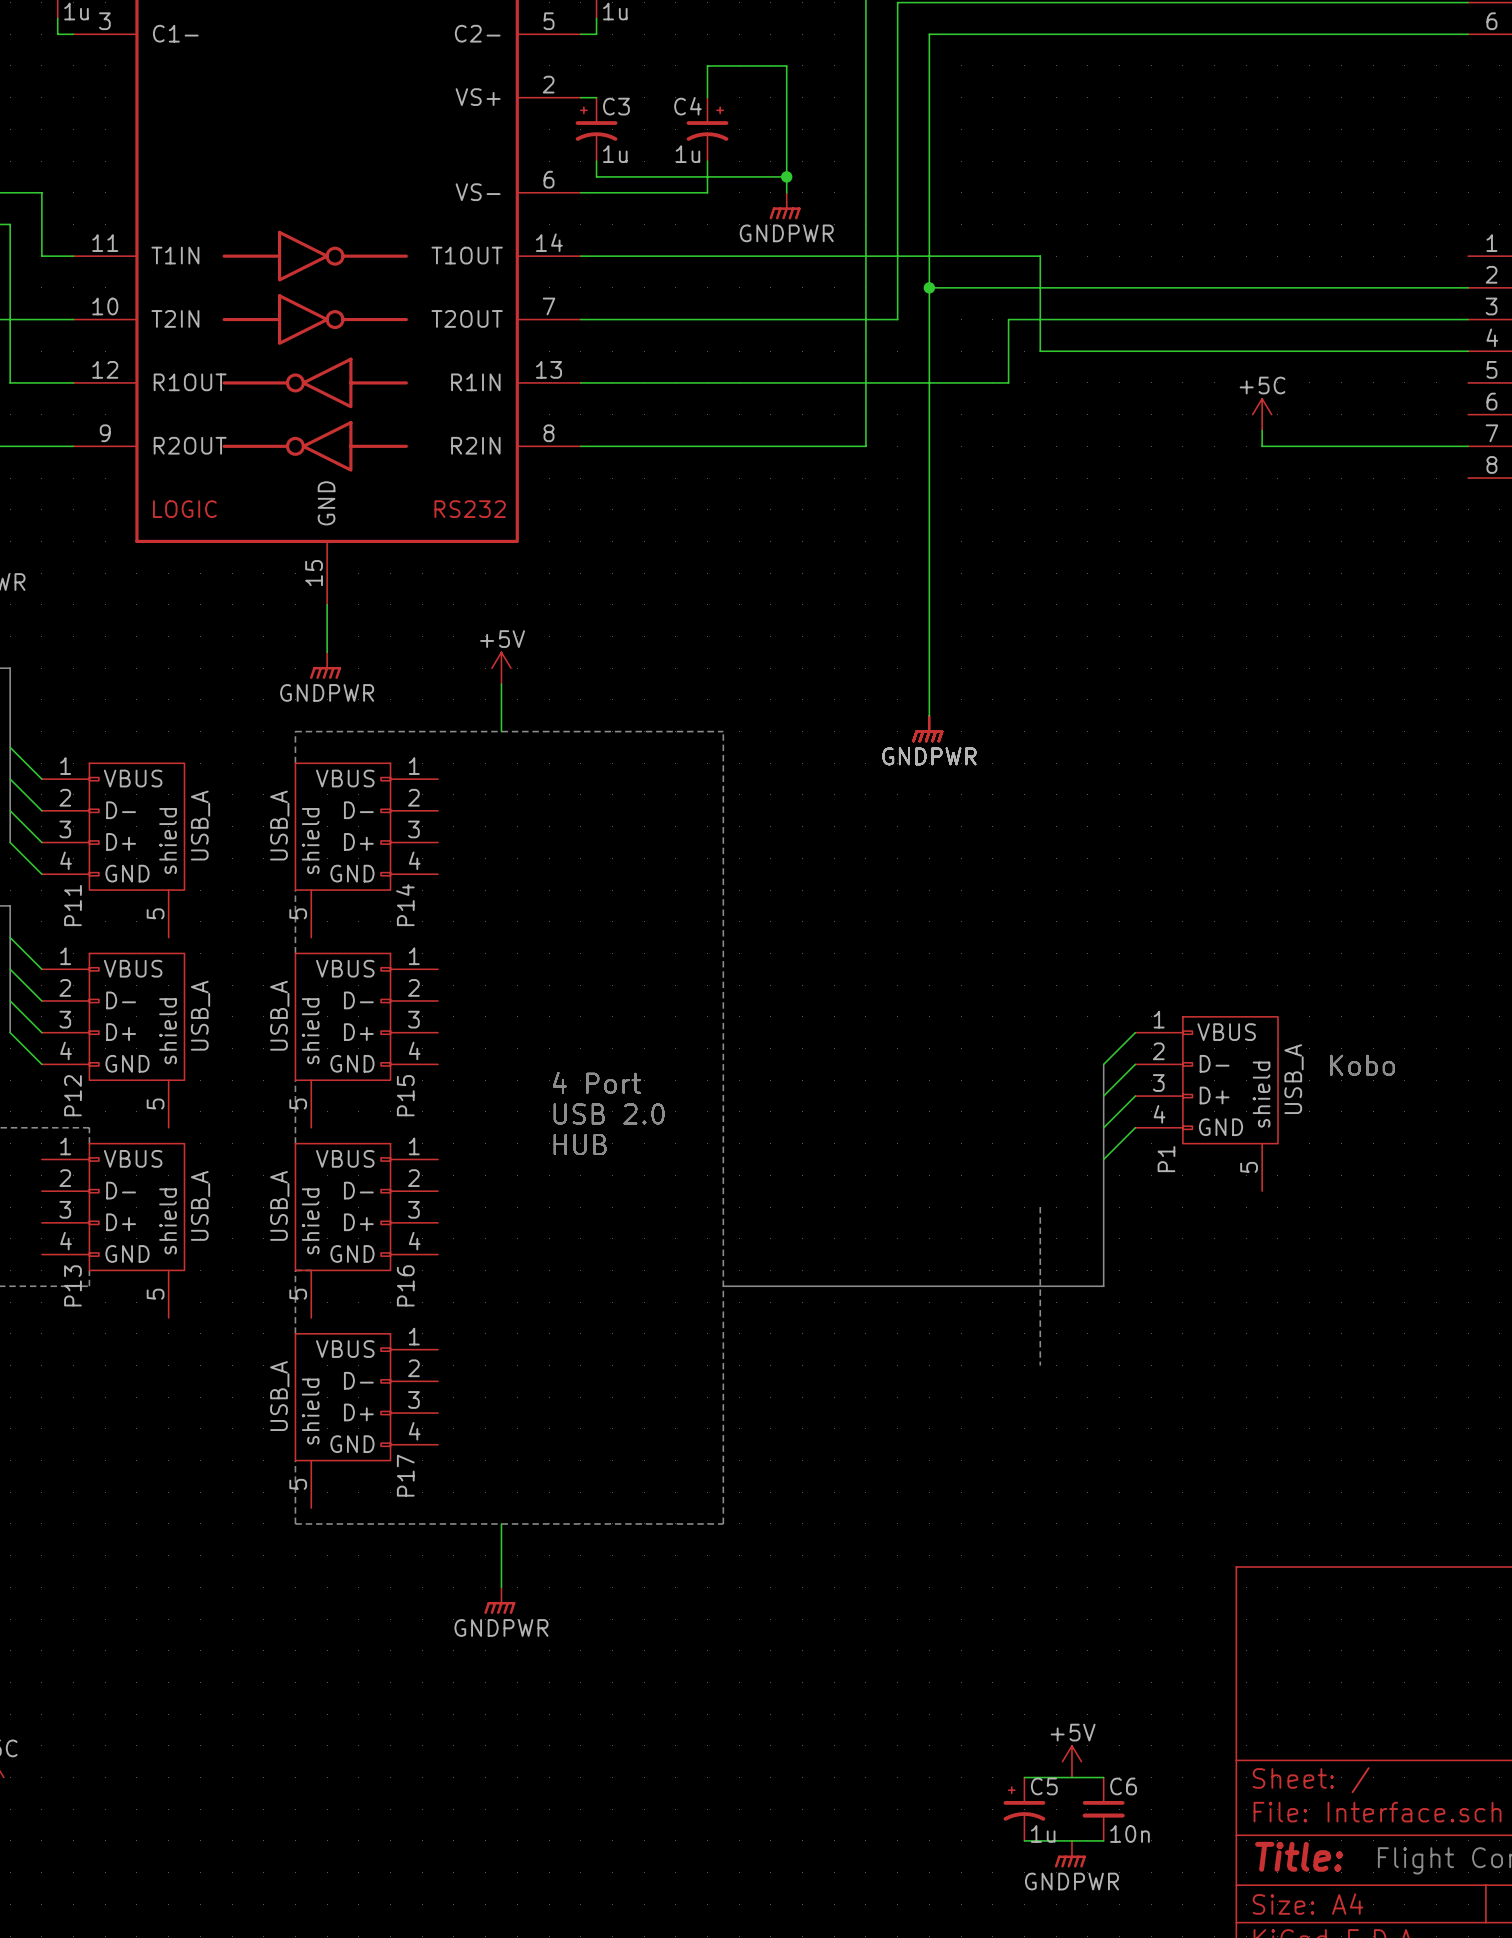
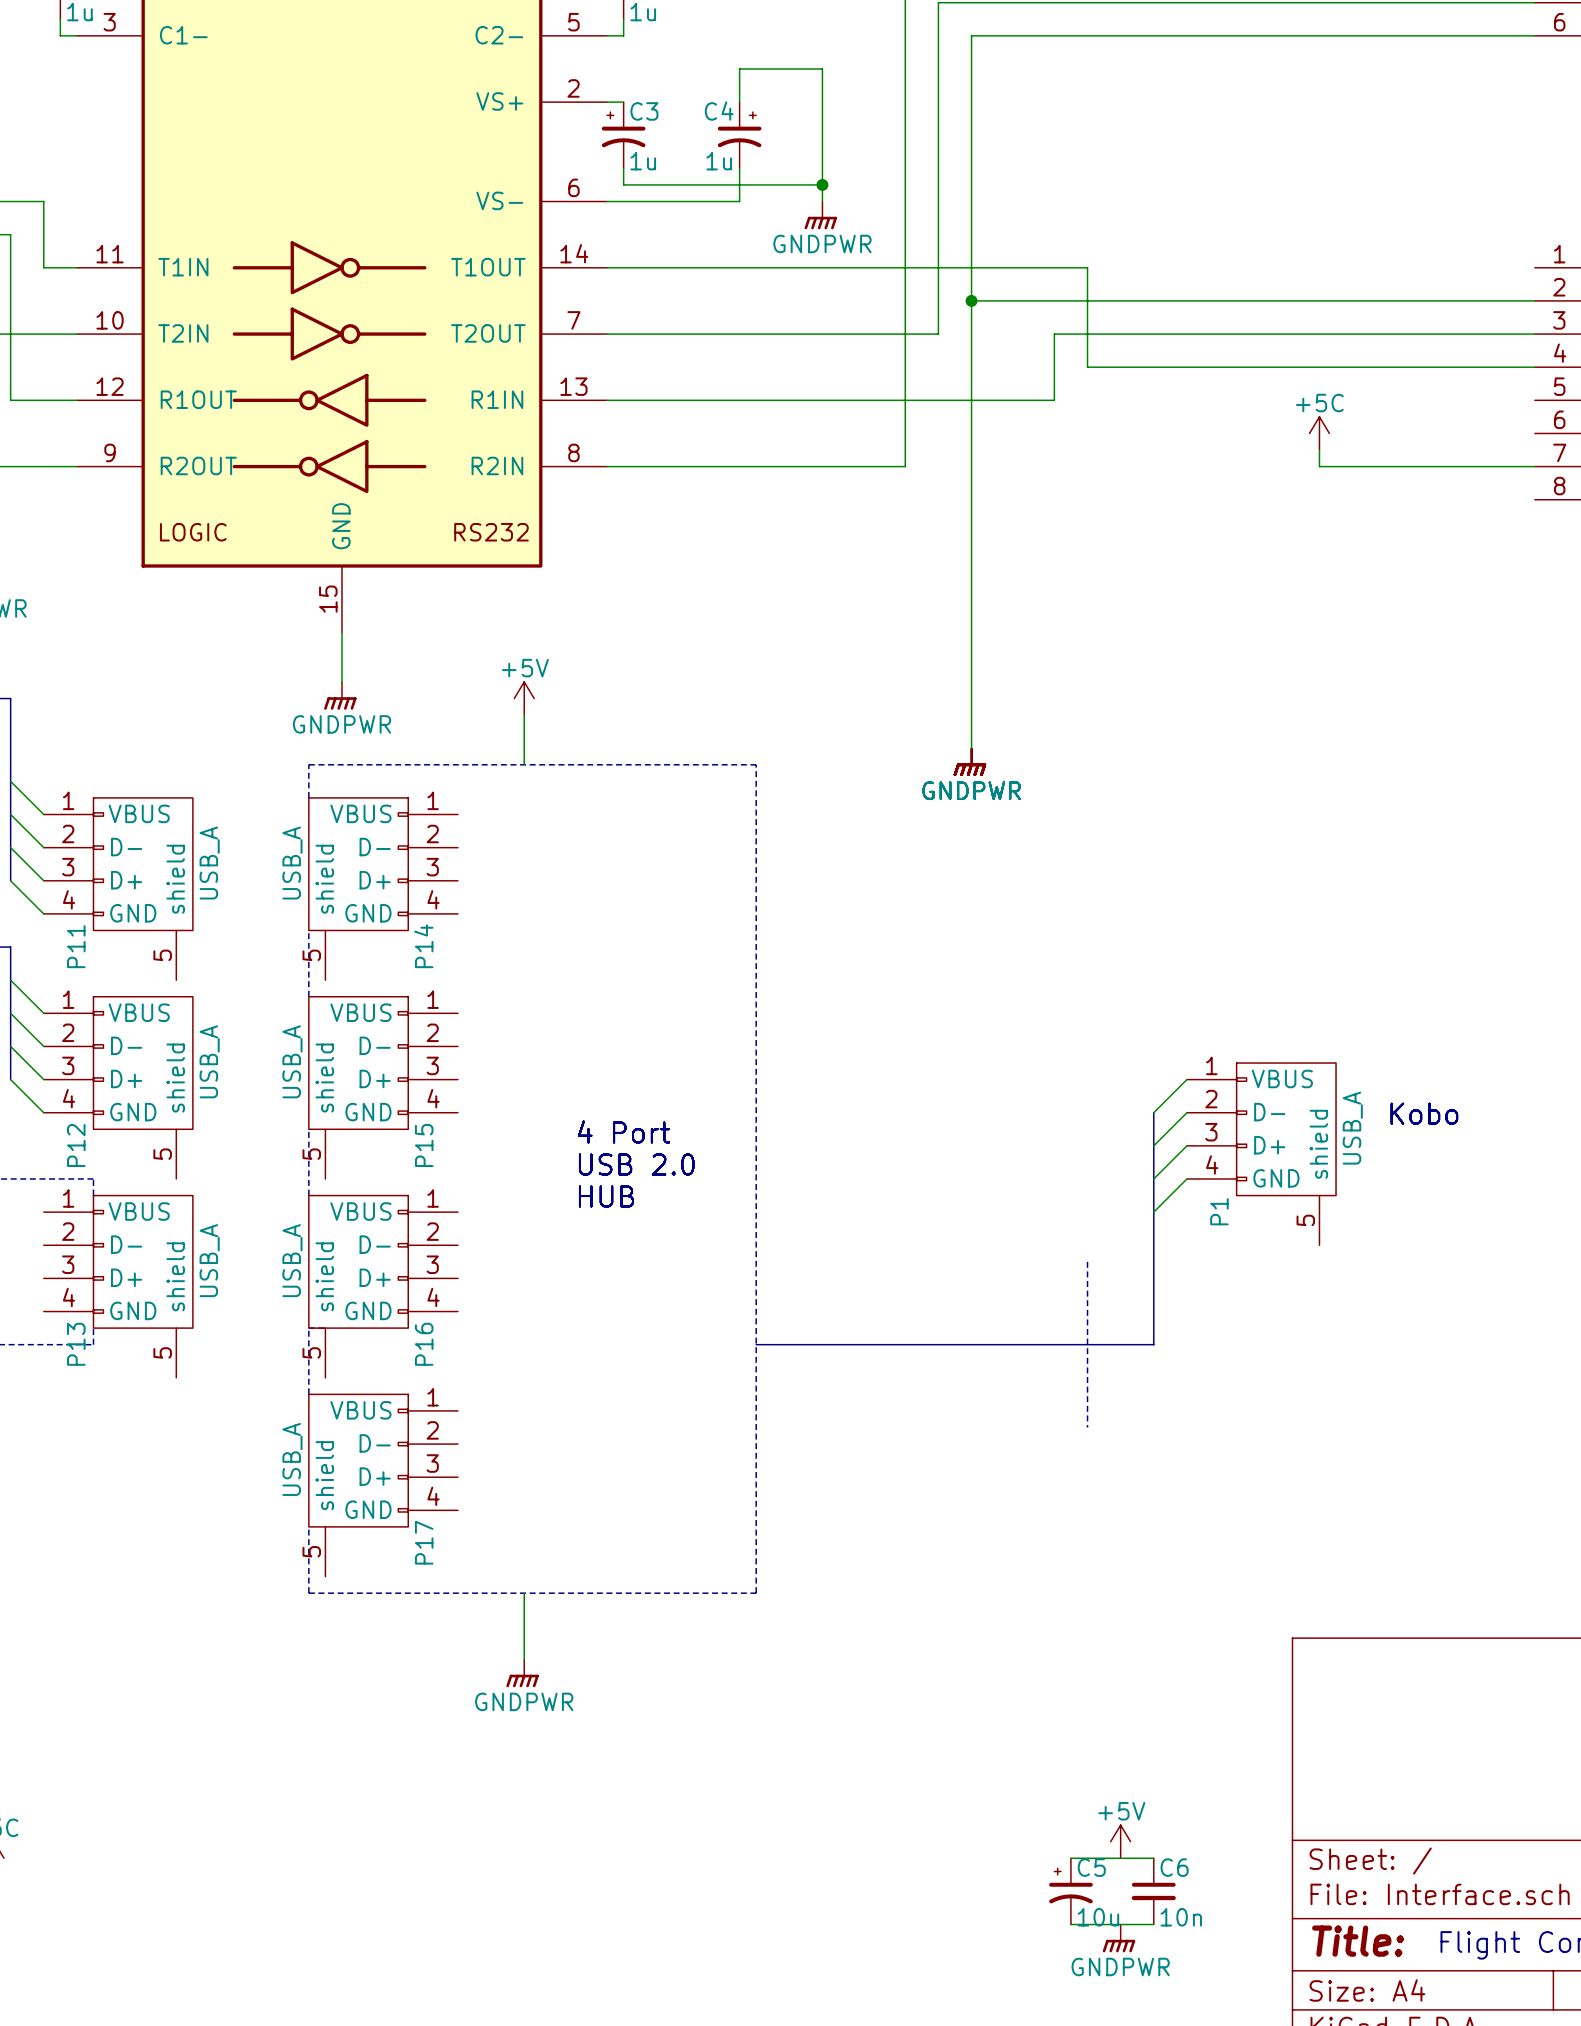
C5 value: 1u (1043, 1834) -> 10u (1098, 1917)

